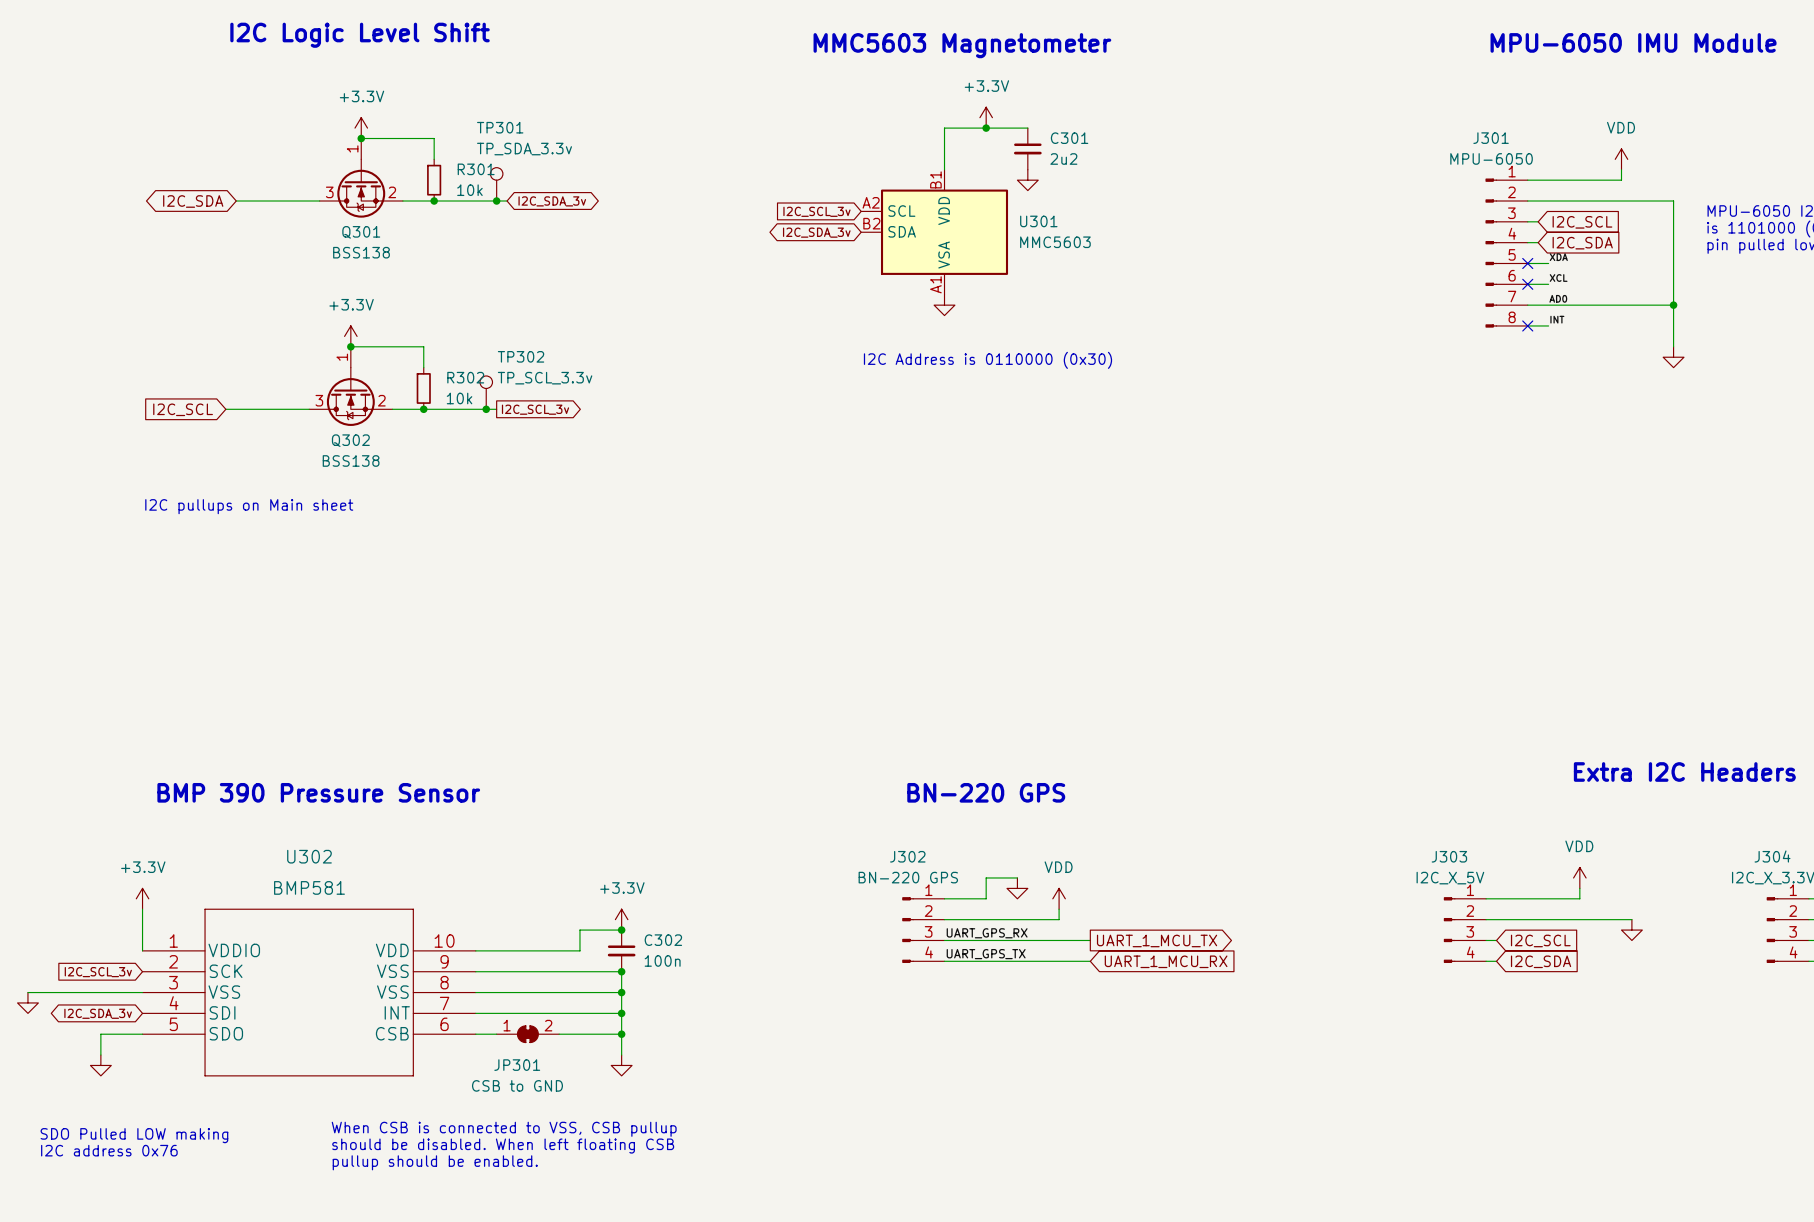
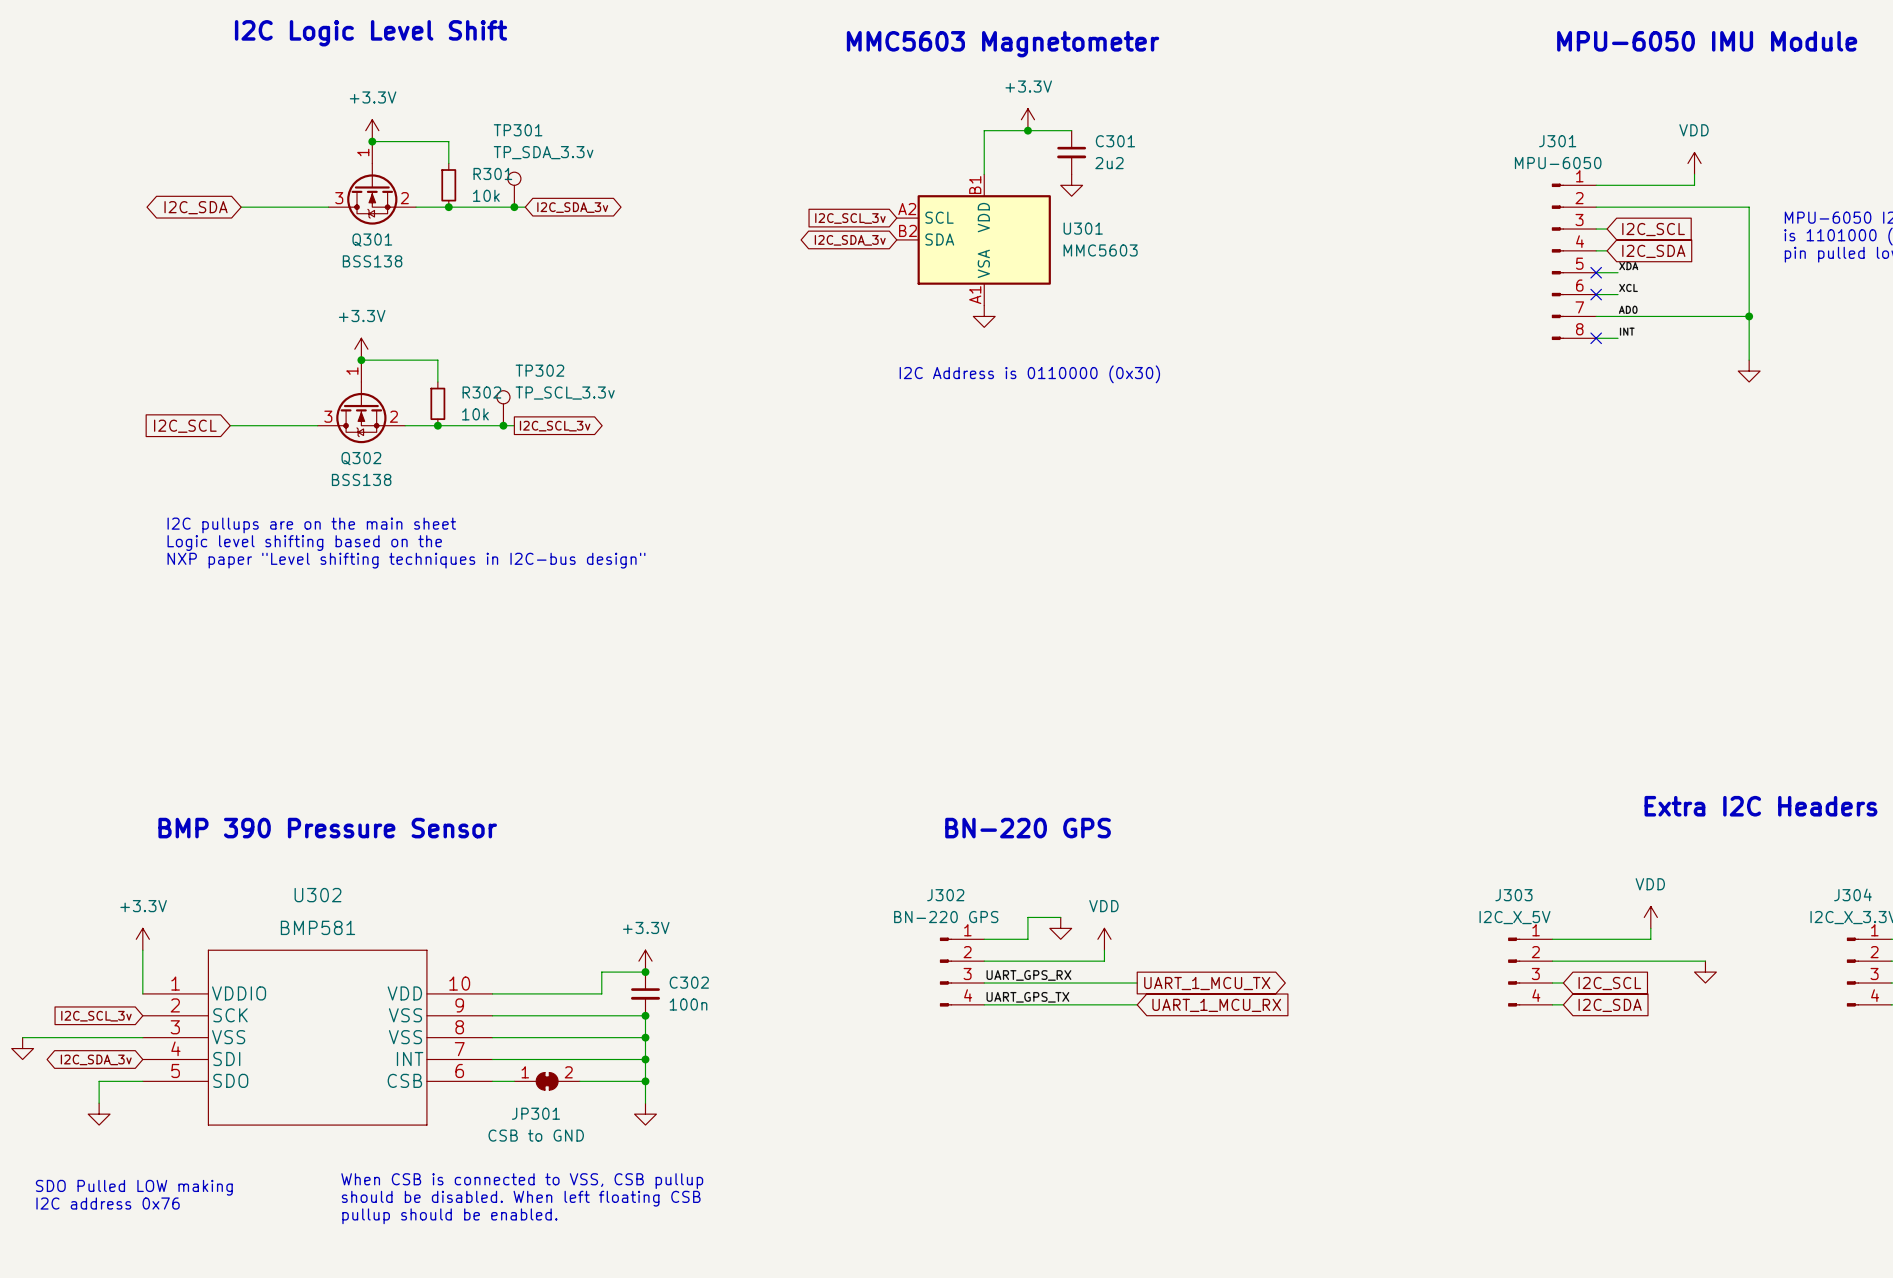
text: I2C pullups on Main sheet (249, 506) -> I2C pullups are on the main sheet (311, 525)
text: none -> Logic level shifting based on the (304, 543)
text: none -> NXP paper "Level shifting techniques in I2C-bus design" (406, 560)

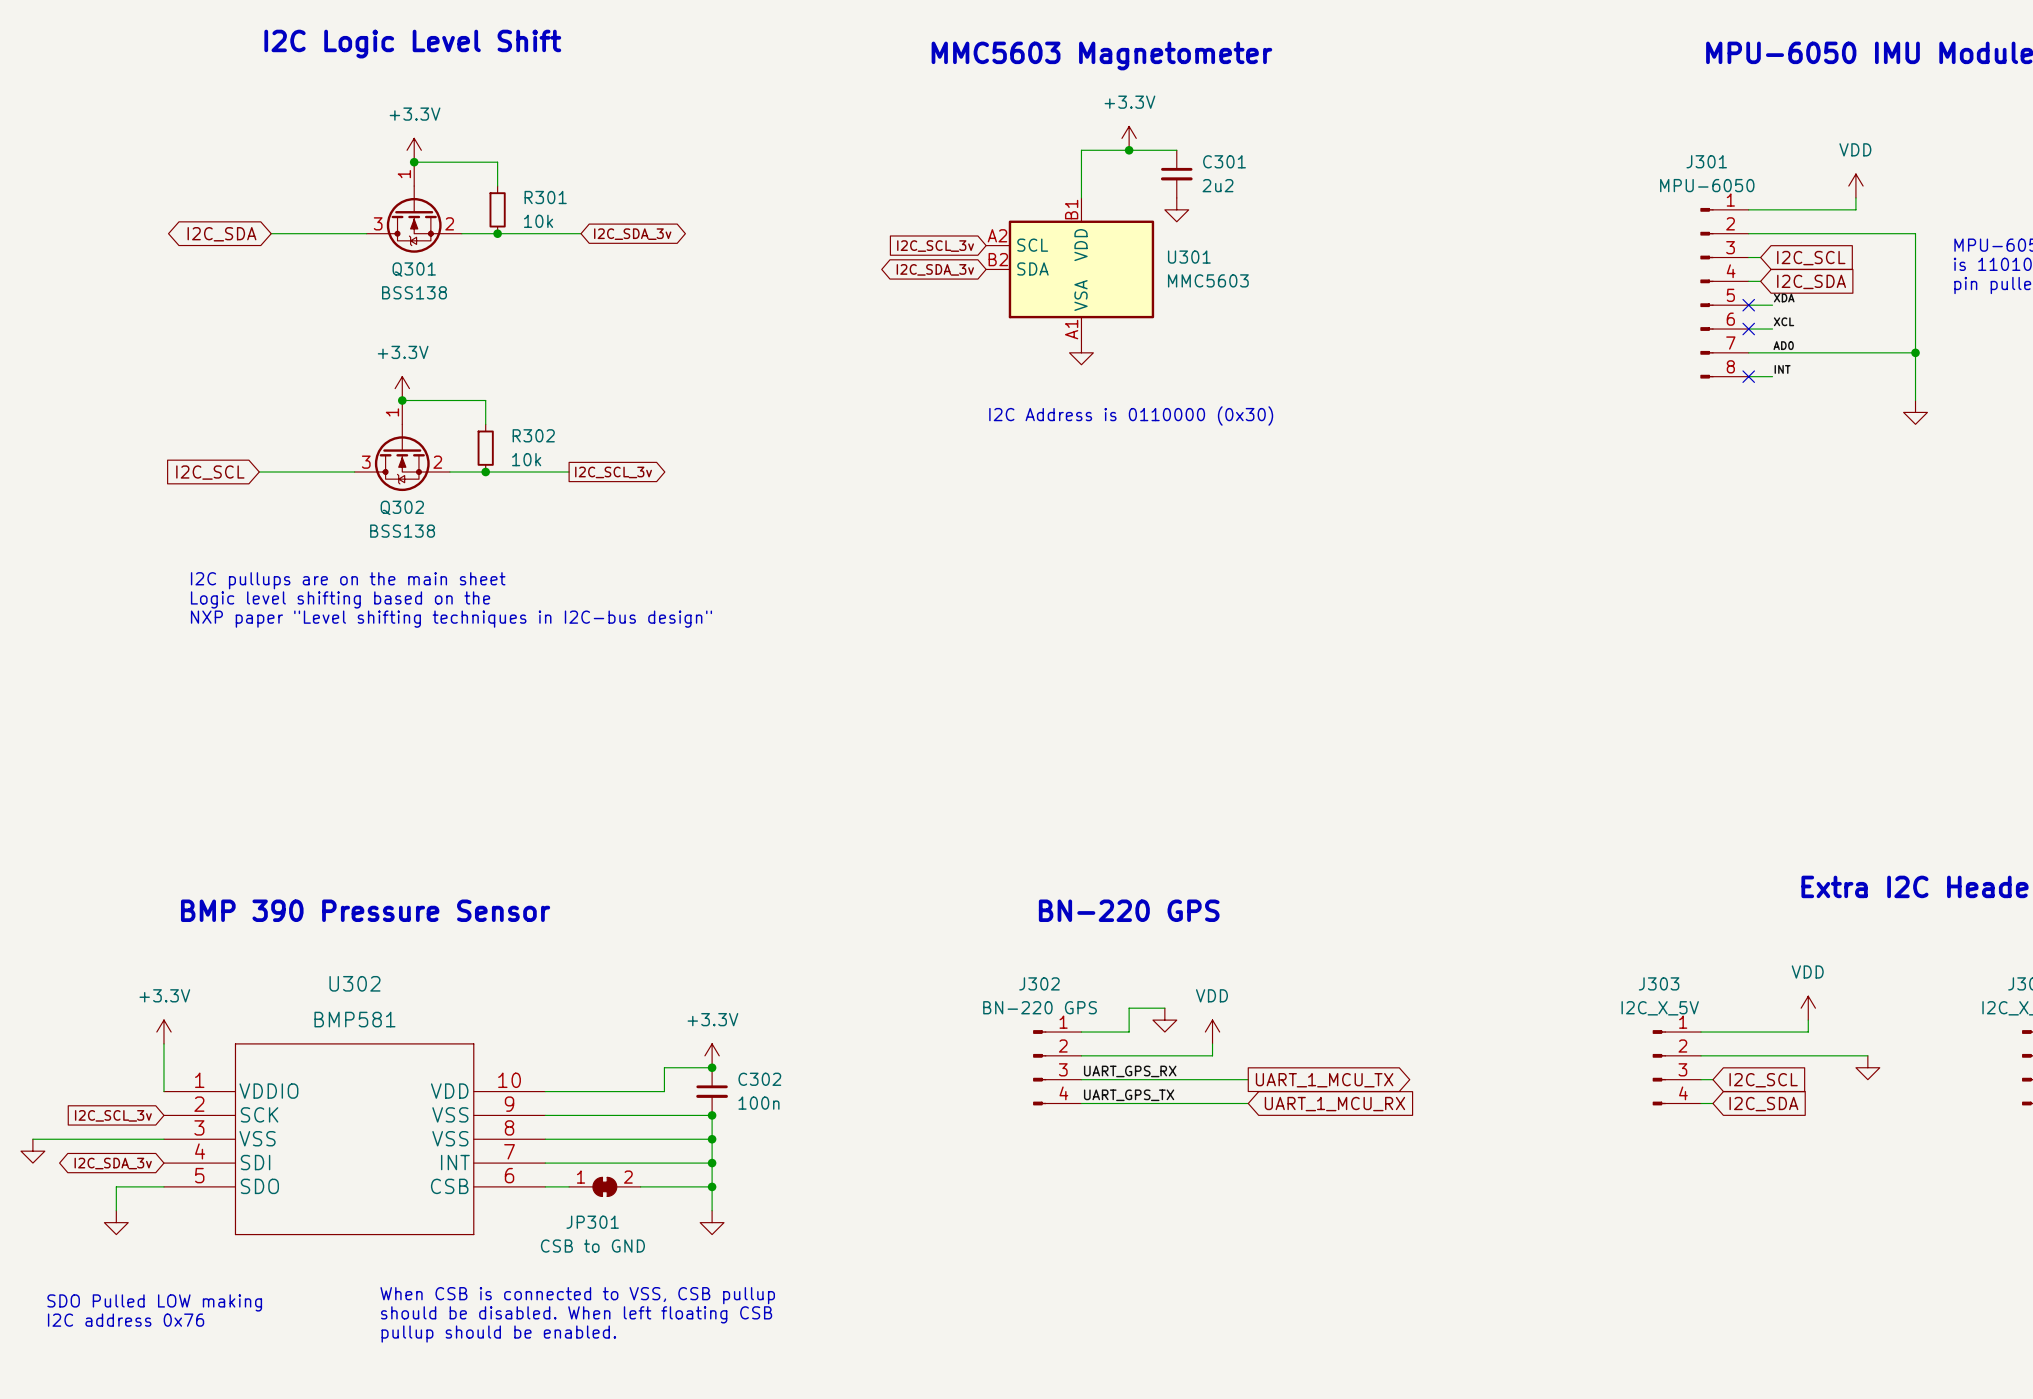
TP301: TP_SDA_3.3v (514, 189) -> none
junction: (514, 207) -> none
TP302: TP_SCL_3.3v (503, 408) -> none
junction: (503, 425) -> none

